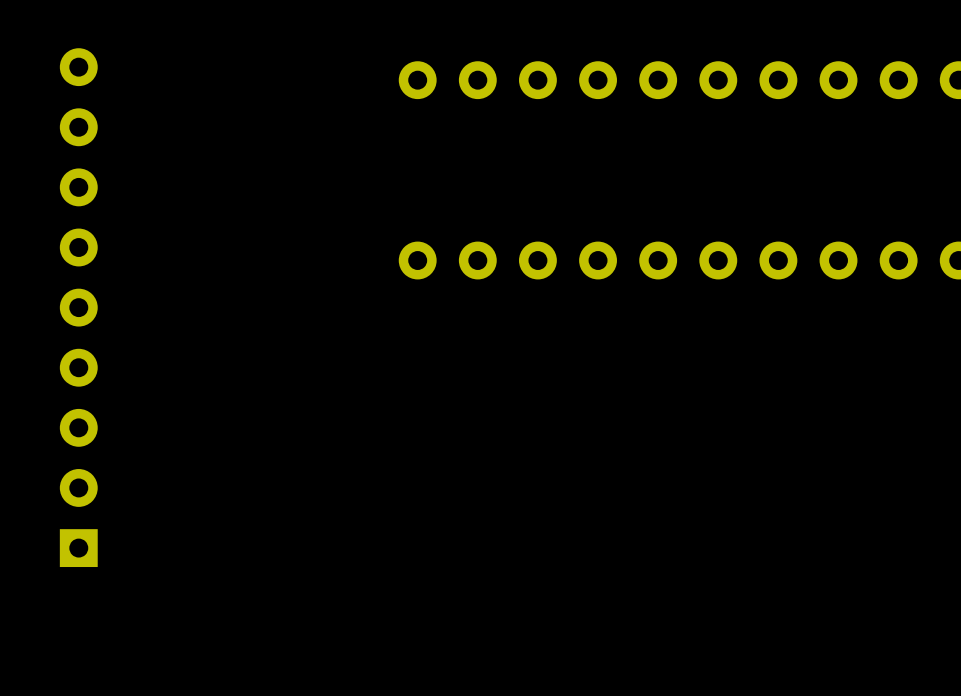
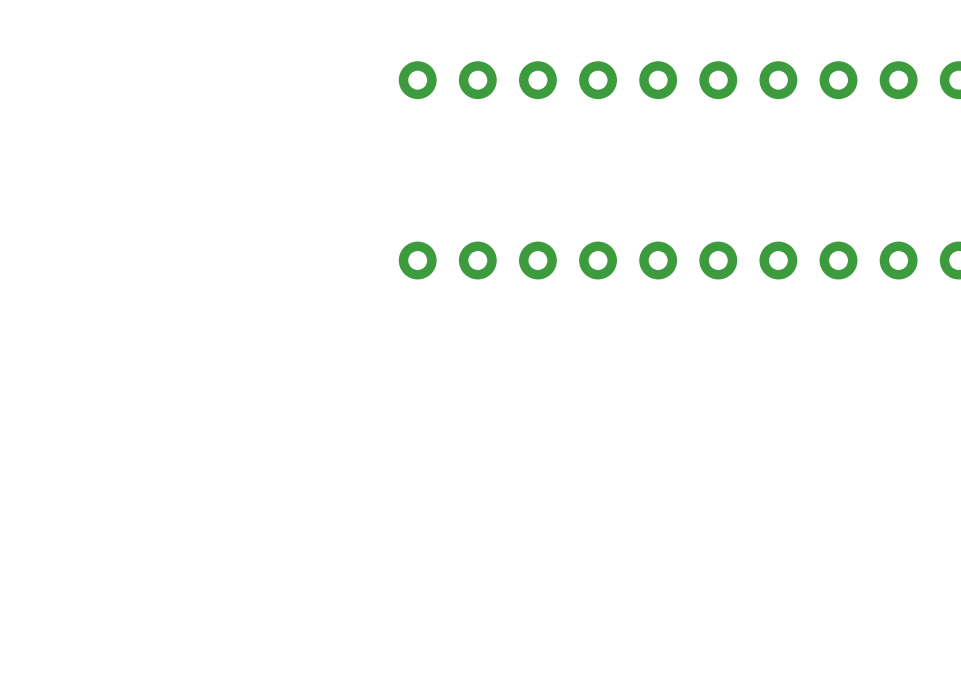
part: (78, 307) -> none

